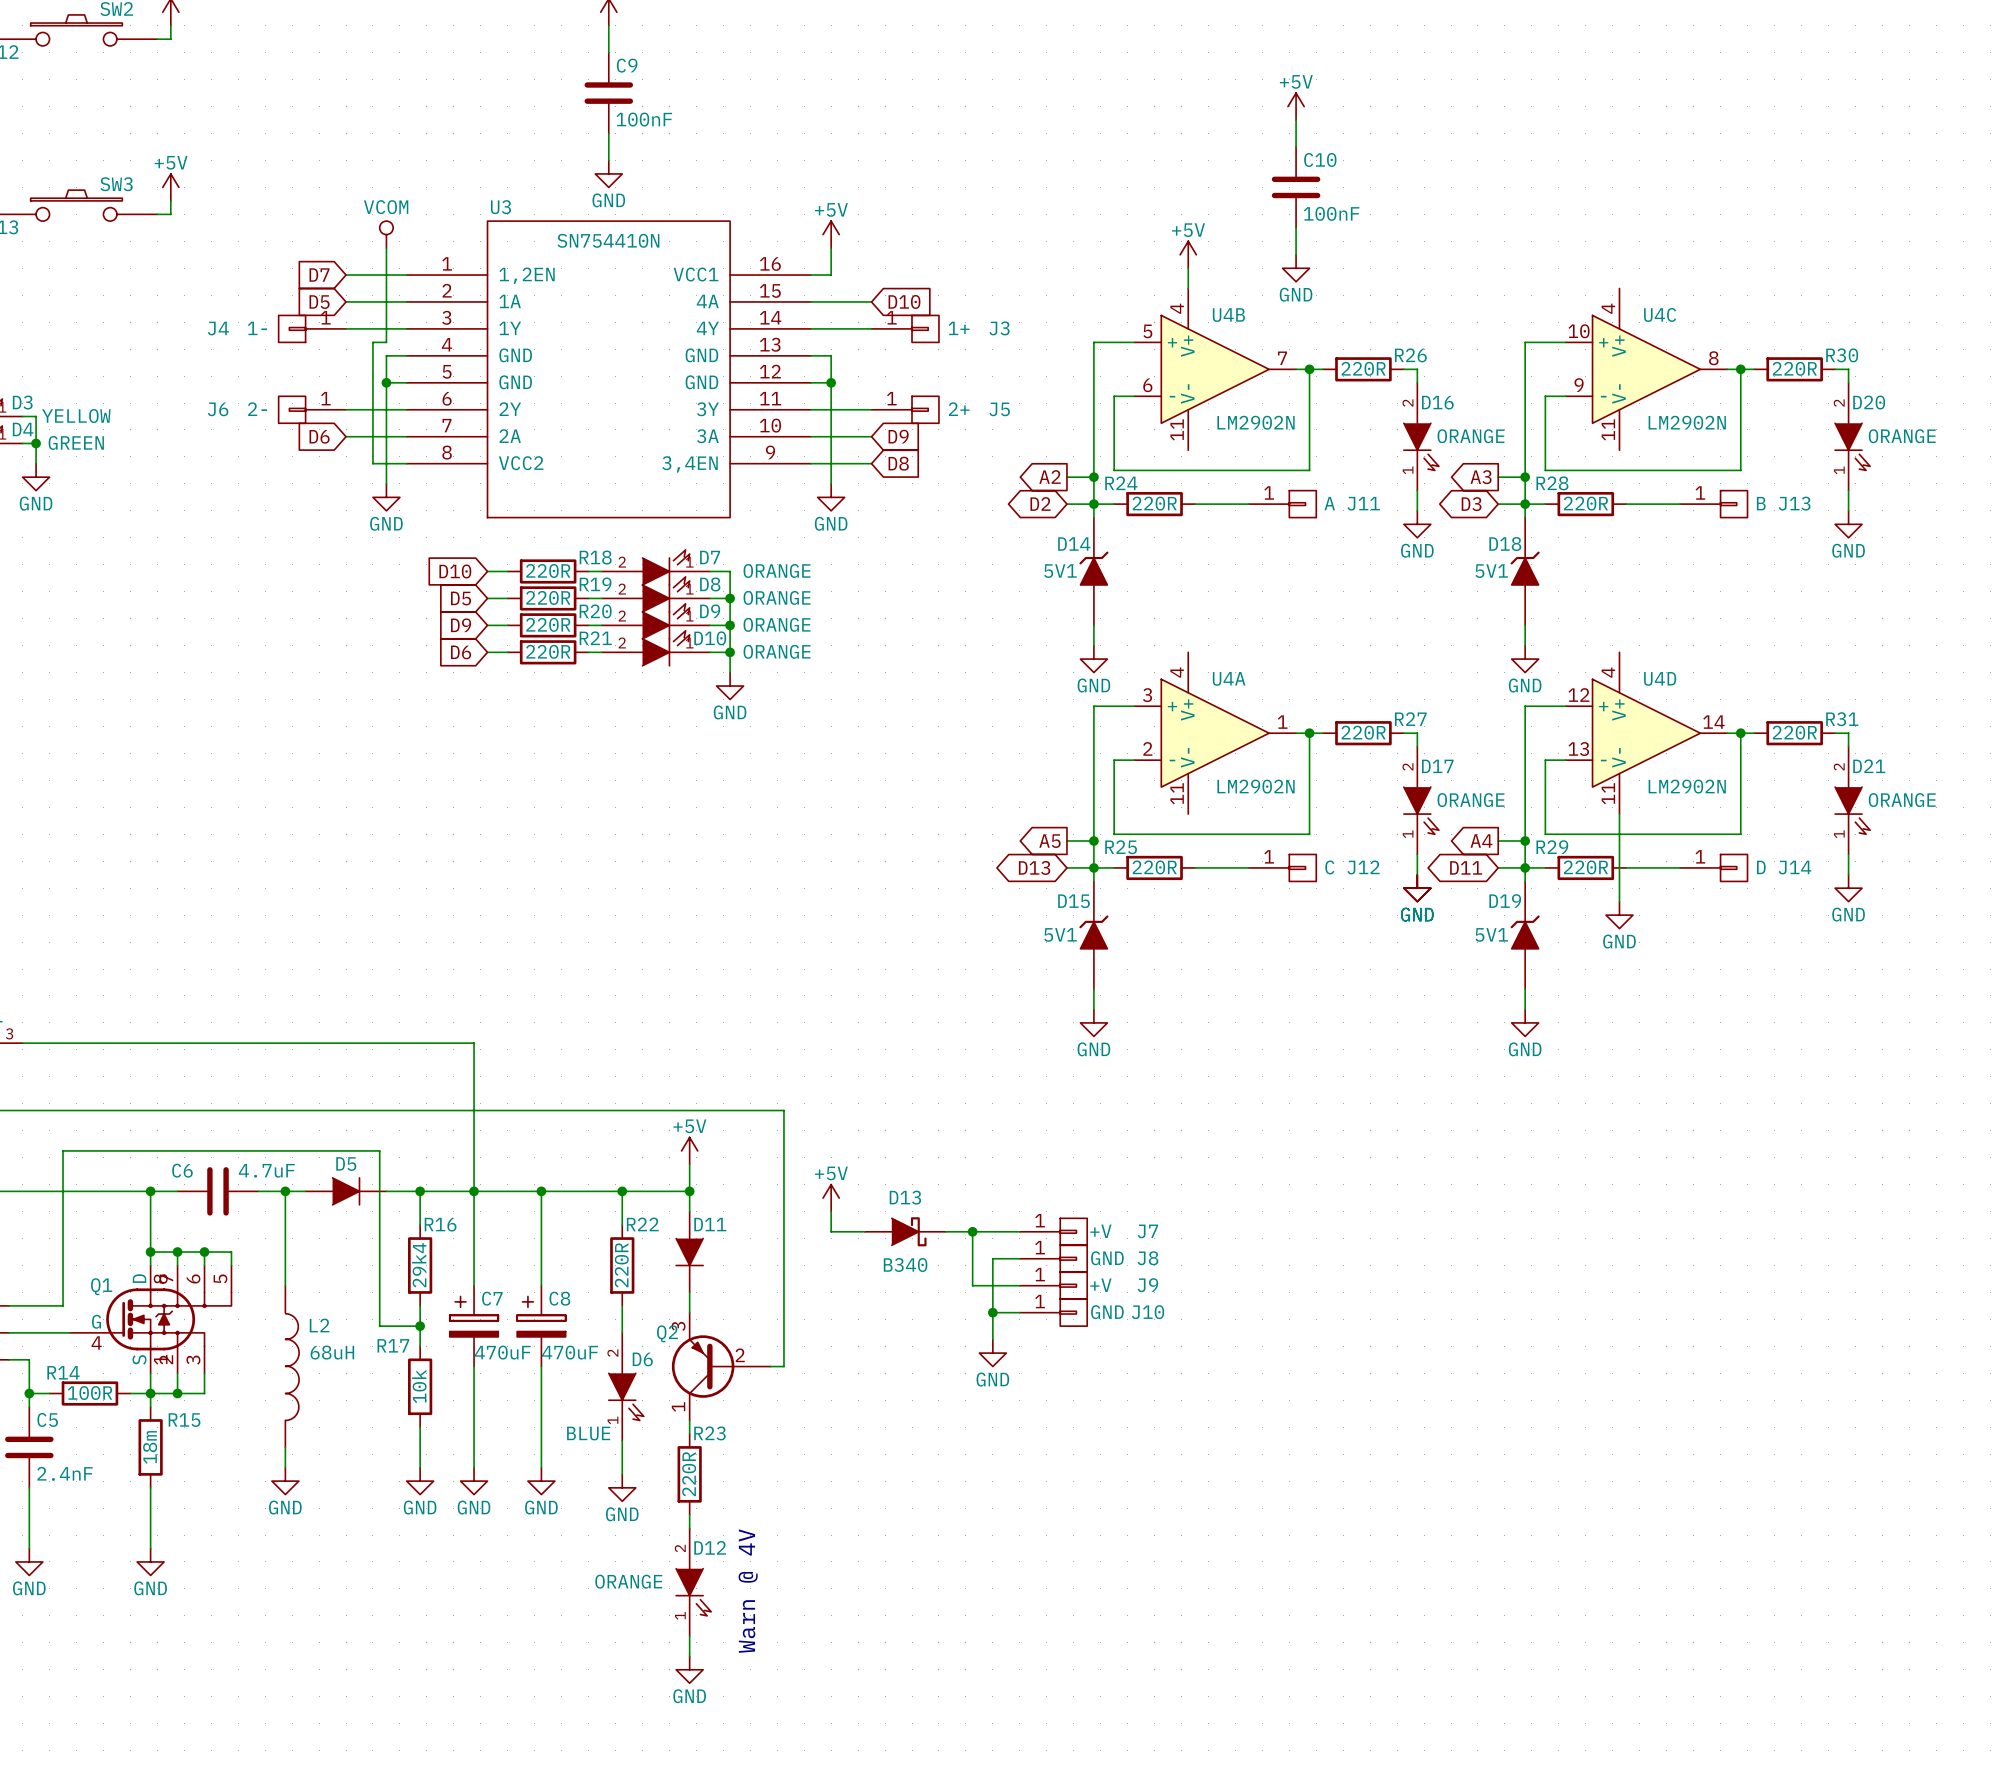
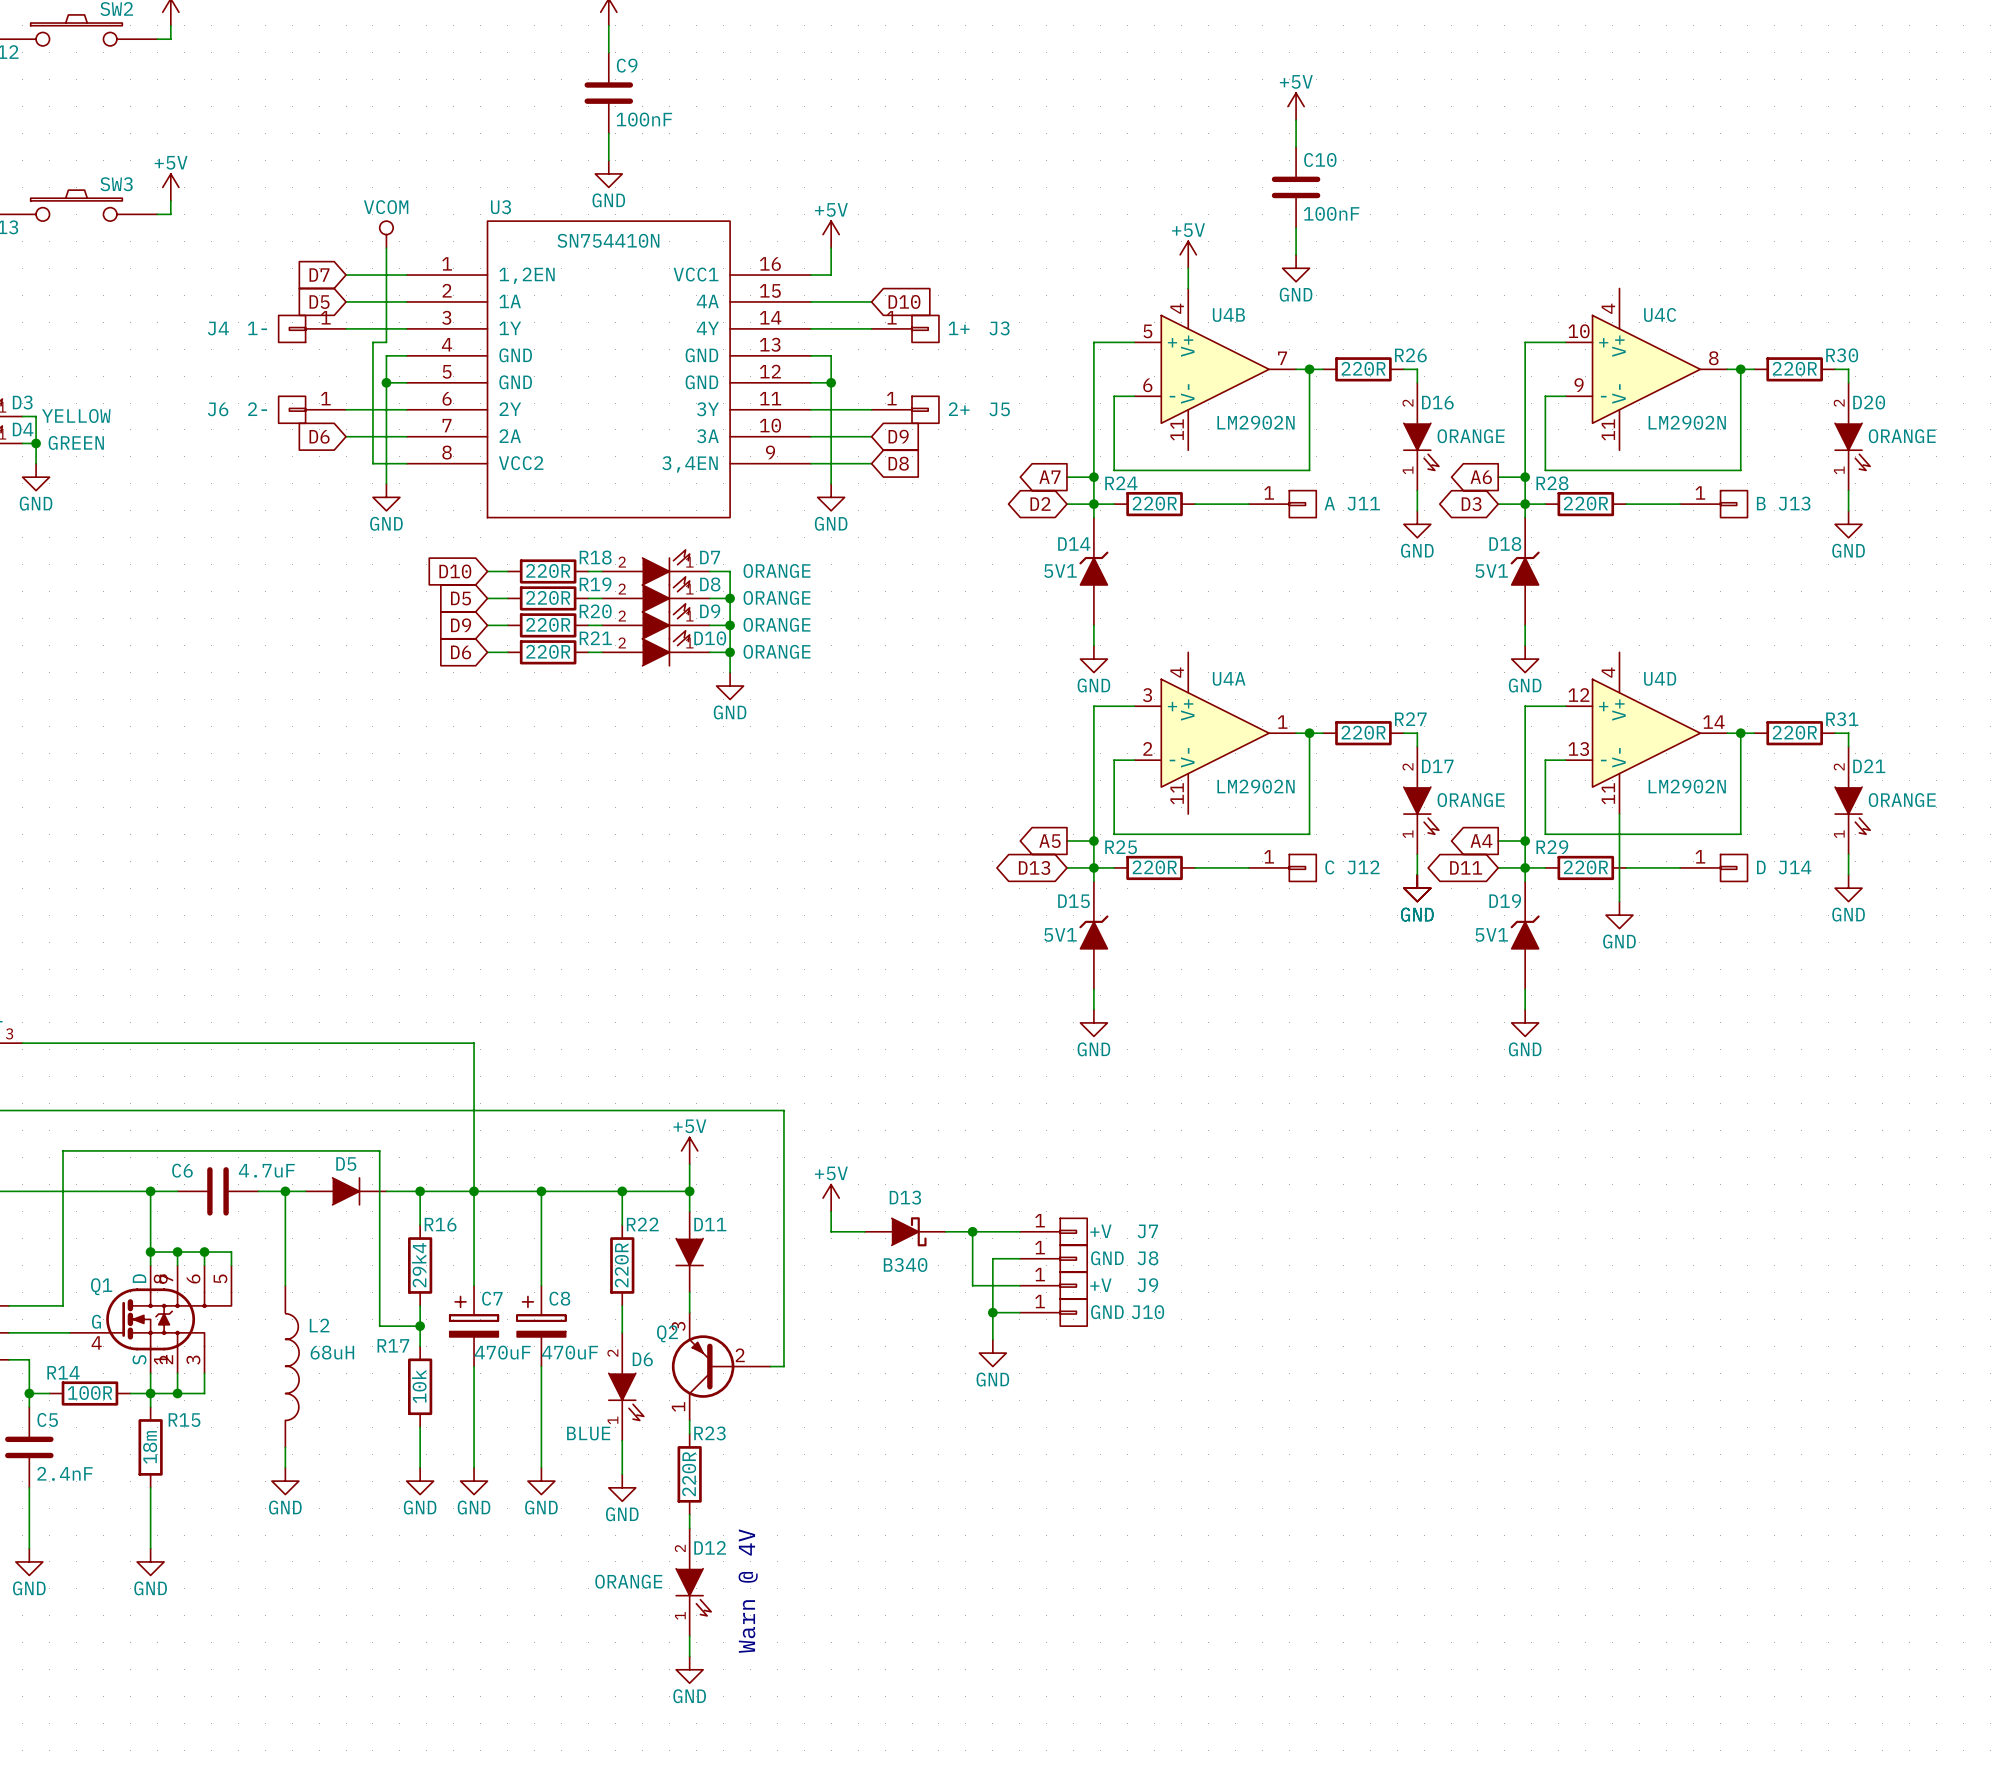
global label: A2 (1050, 477) -> A7 (1049, 477)
global label: A3 (1481, 477) -> A6 (1481, 477)

